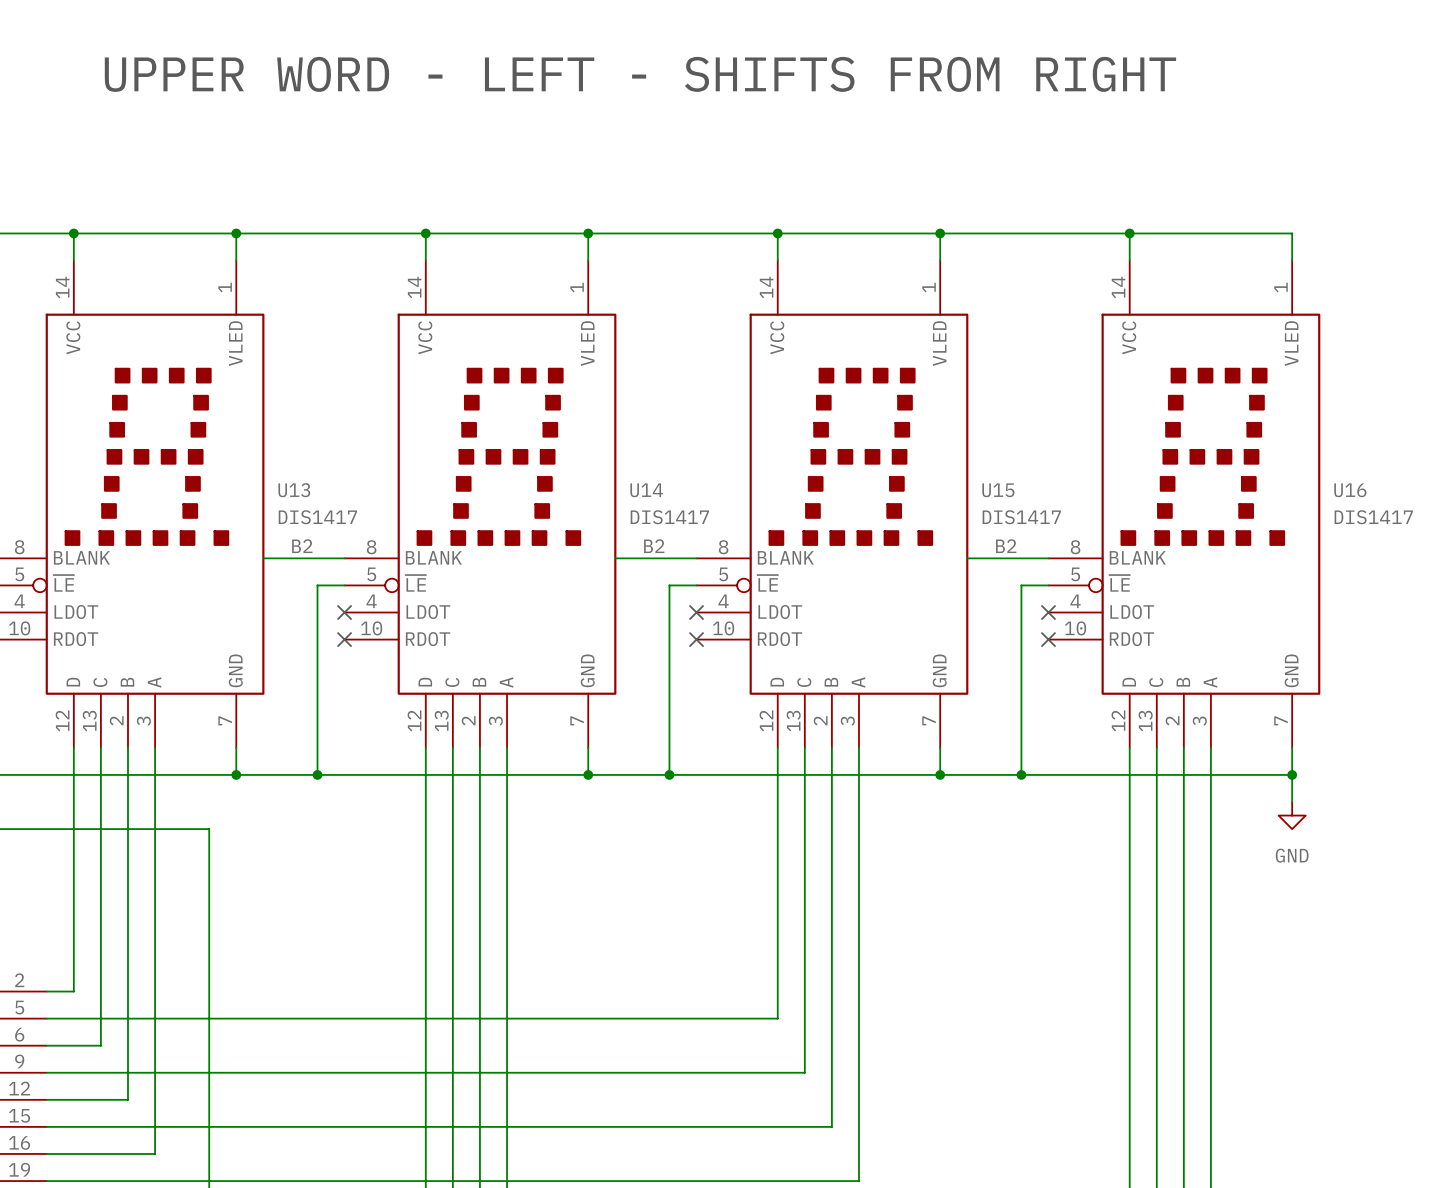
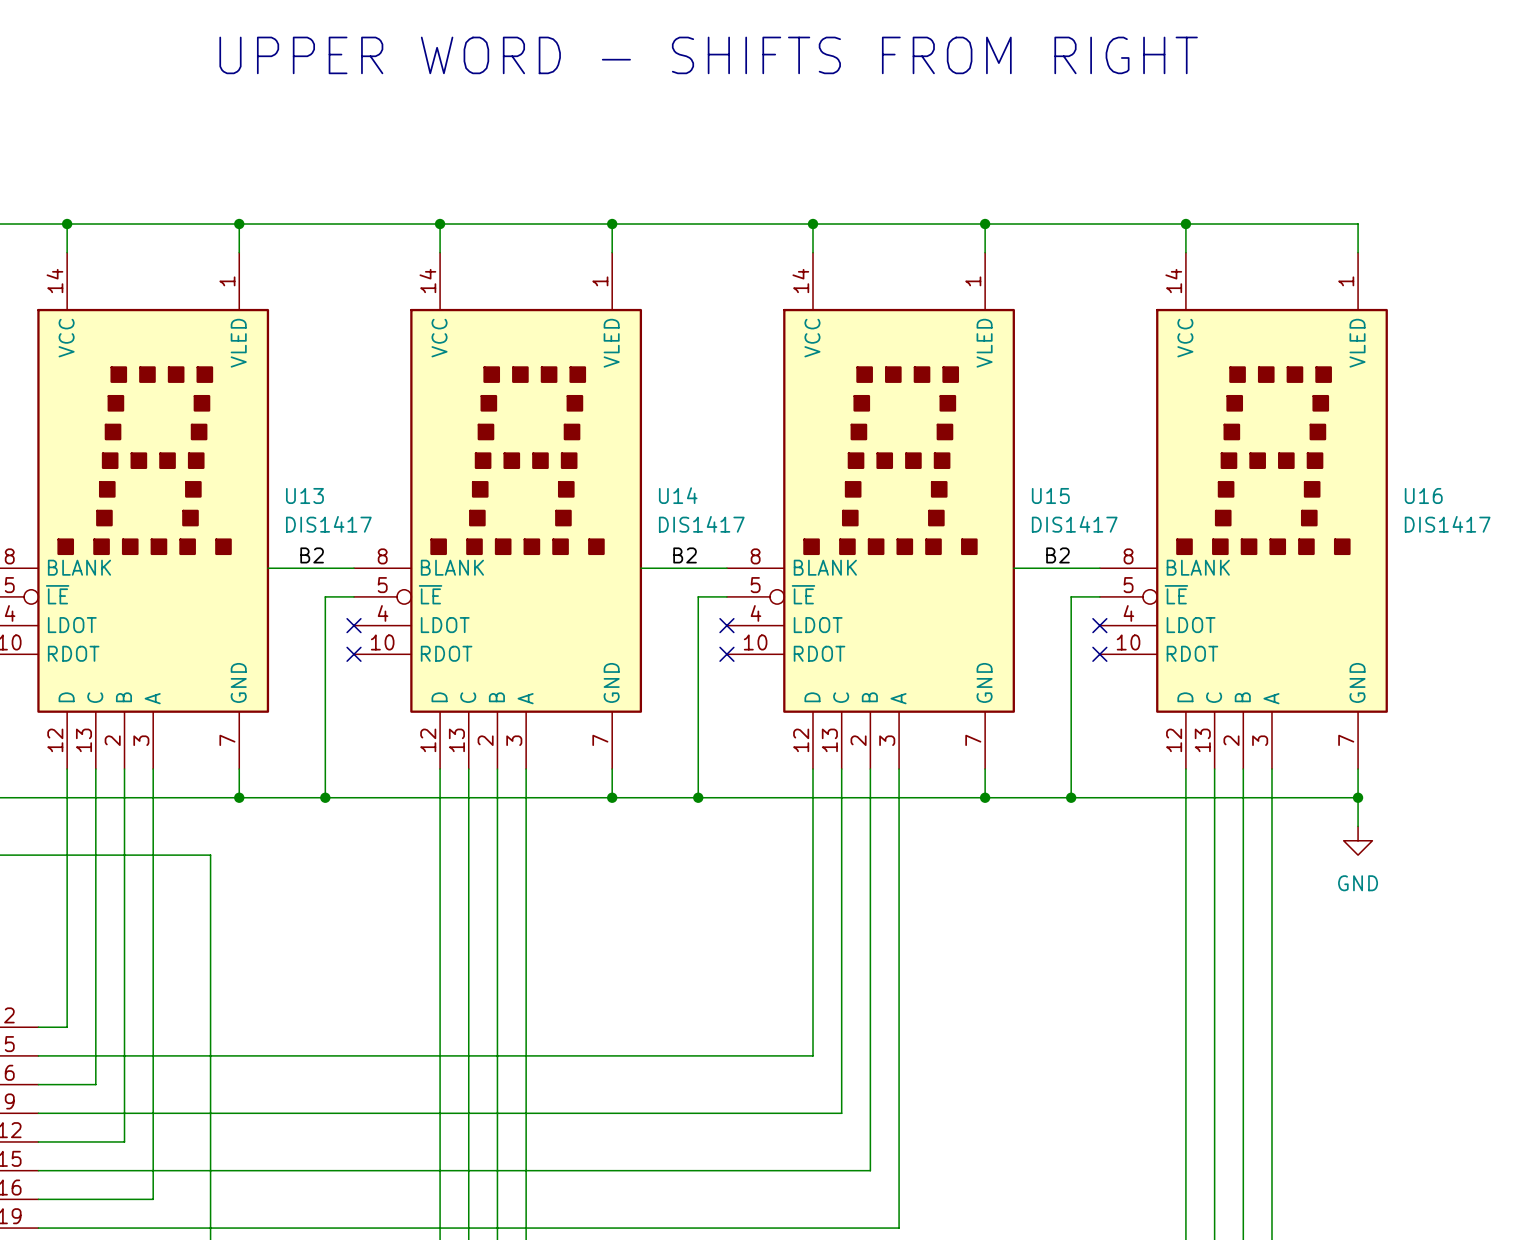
text: UPPER WORD - LEFT - SHIFTS FROM RIGHT (640, 74) -> UPPER WORD - SHIFTS FROM RIGHT (708, 55)

